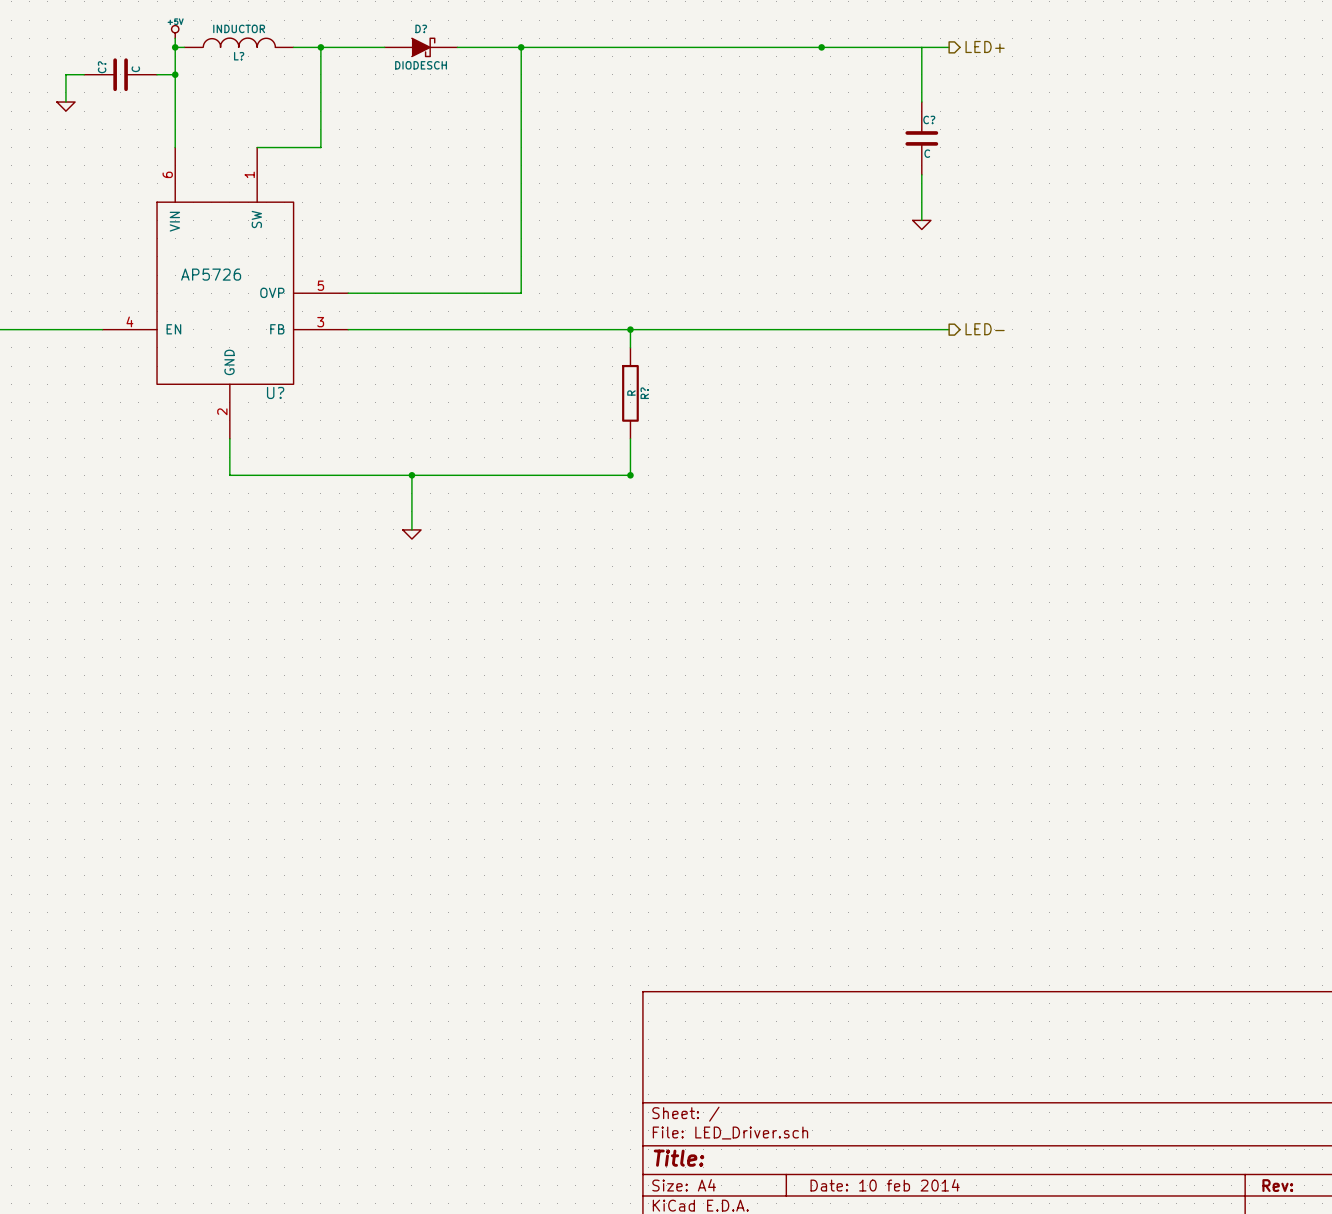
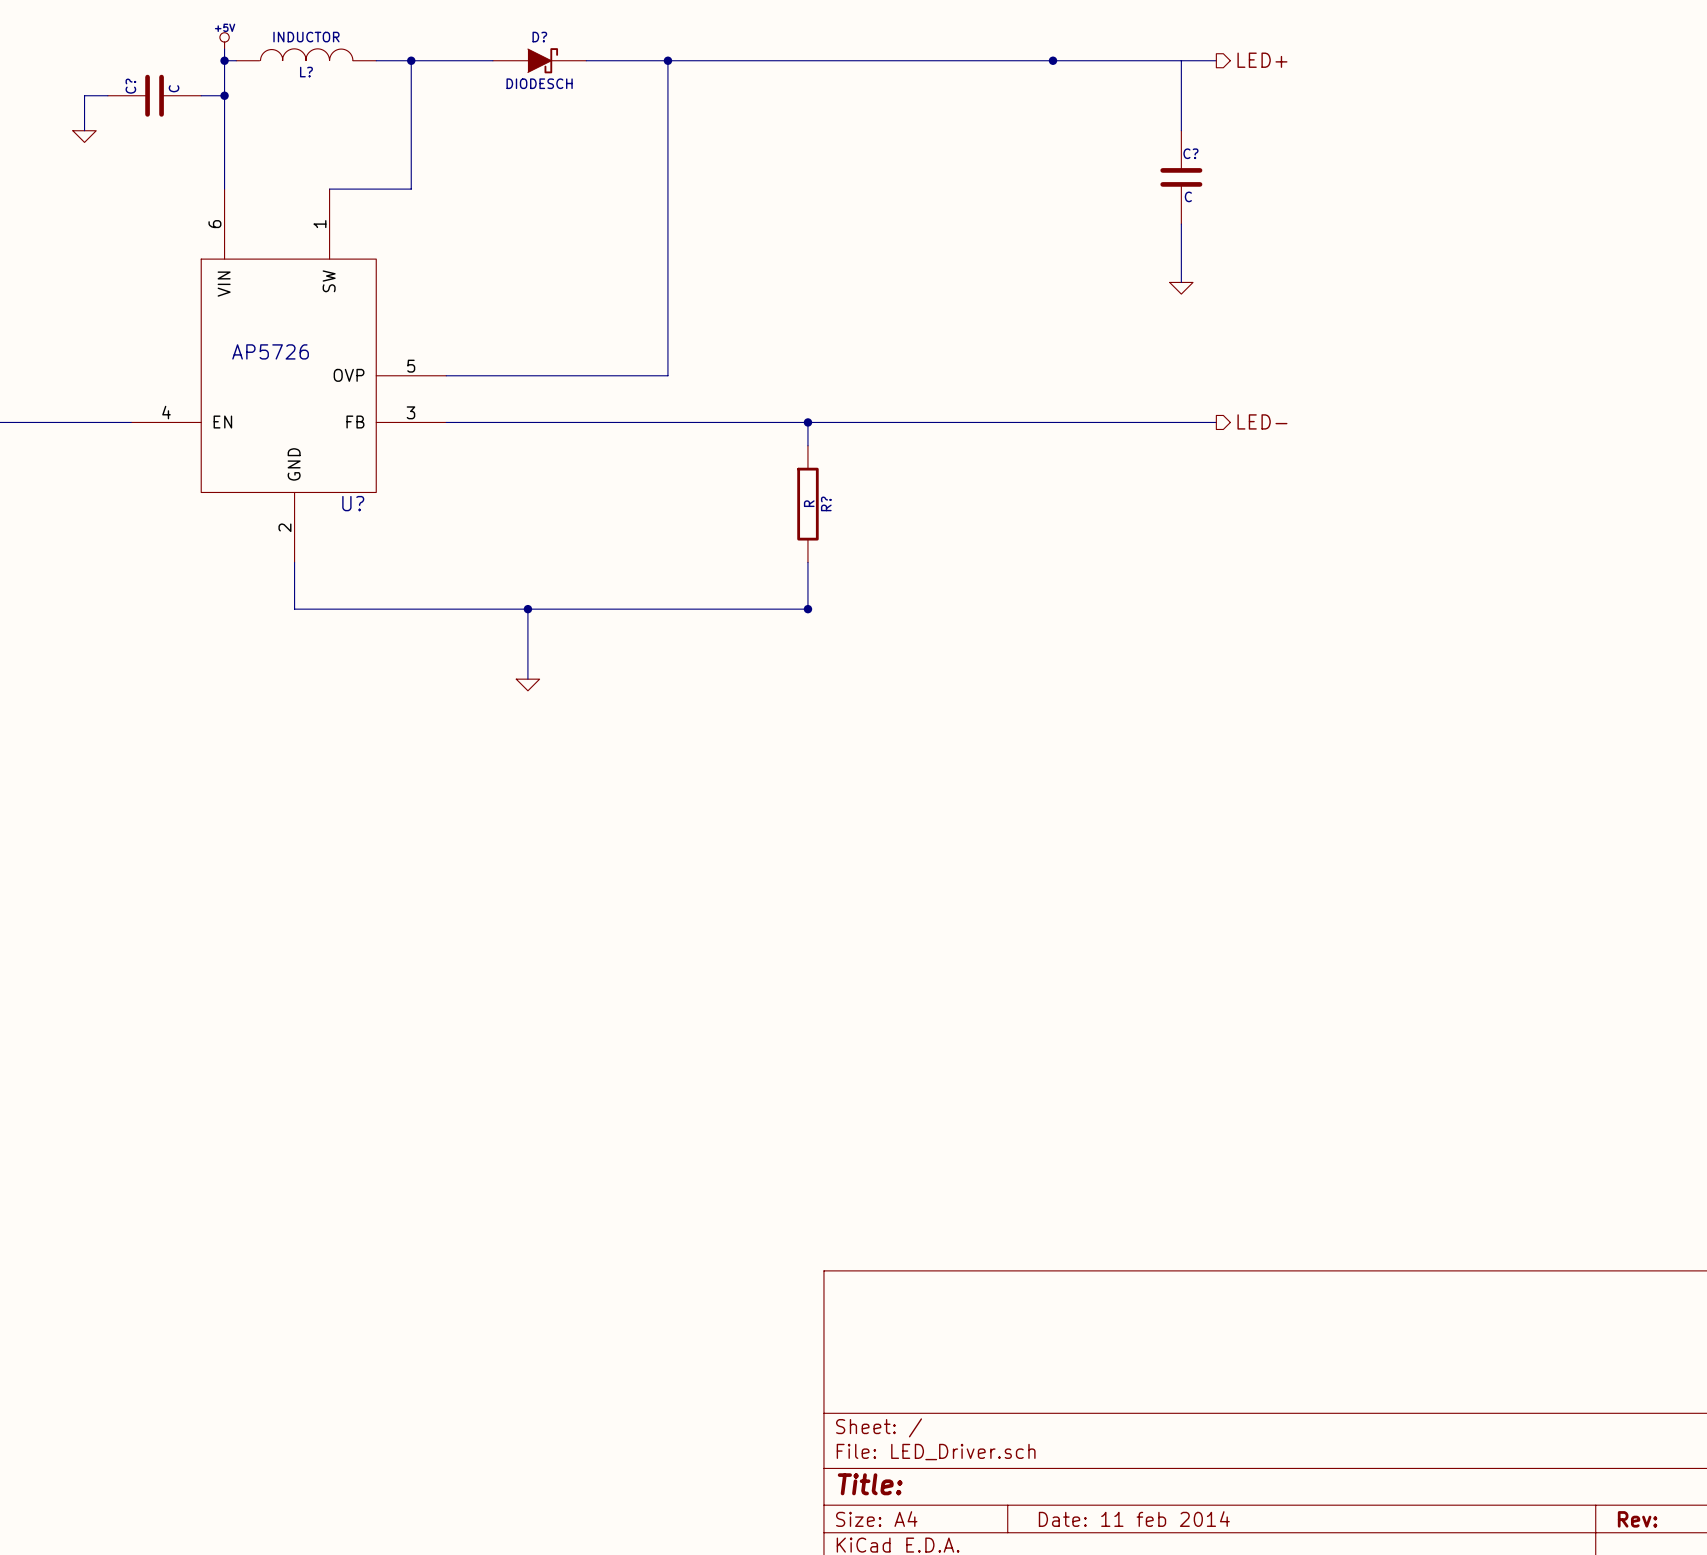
title block: Date: 10 feb 2014 (885, 1185) -> Date: 11 feb 2014 (1134, 1519)

